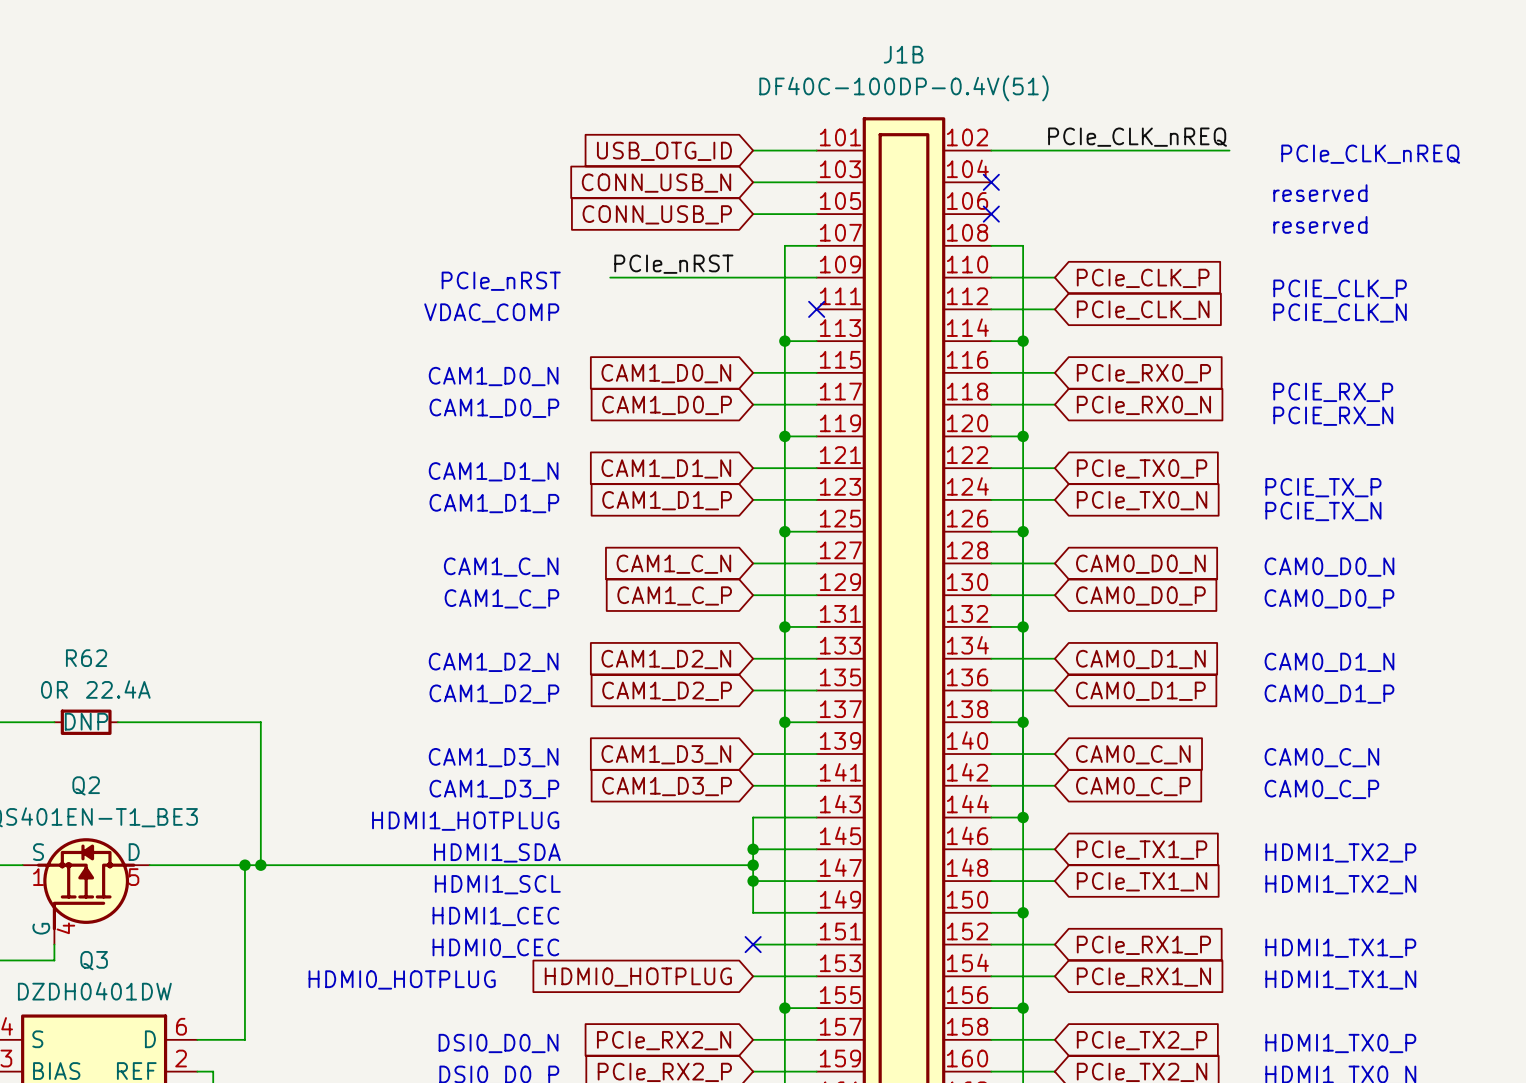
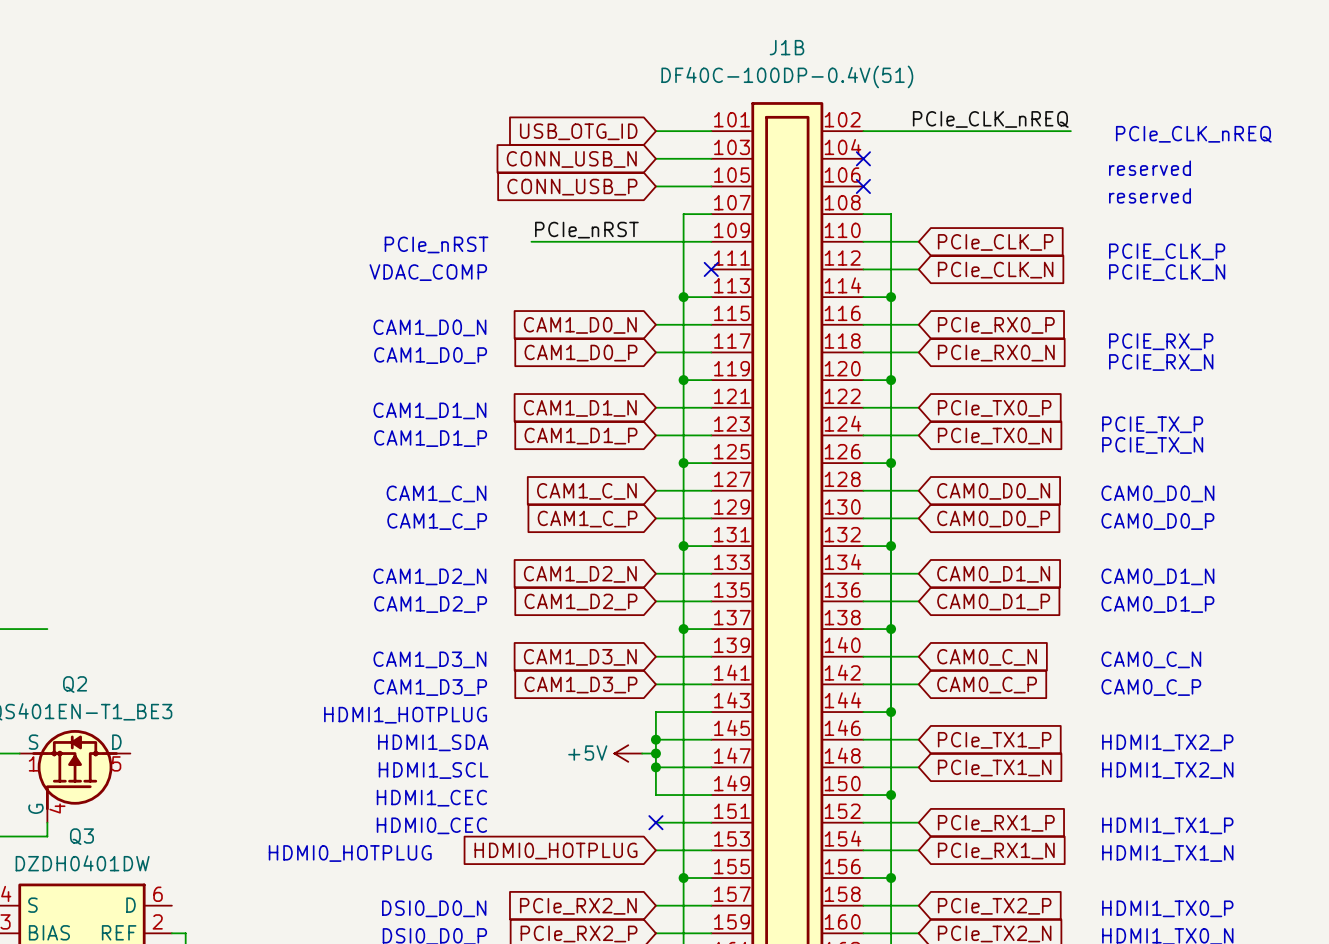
R62: (86, 722) -> none
wire: (117, 722) (260, 722) (260, 865) -> none
wire: (149, 865) (737, 865) -> none
wire: (244, 865) (244, 1039) (197, 1039) -> none
junction: (244, 865) -> none
junction: (260, 865) -> none
power symbol: none -> +5V (628, 753)

